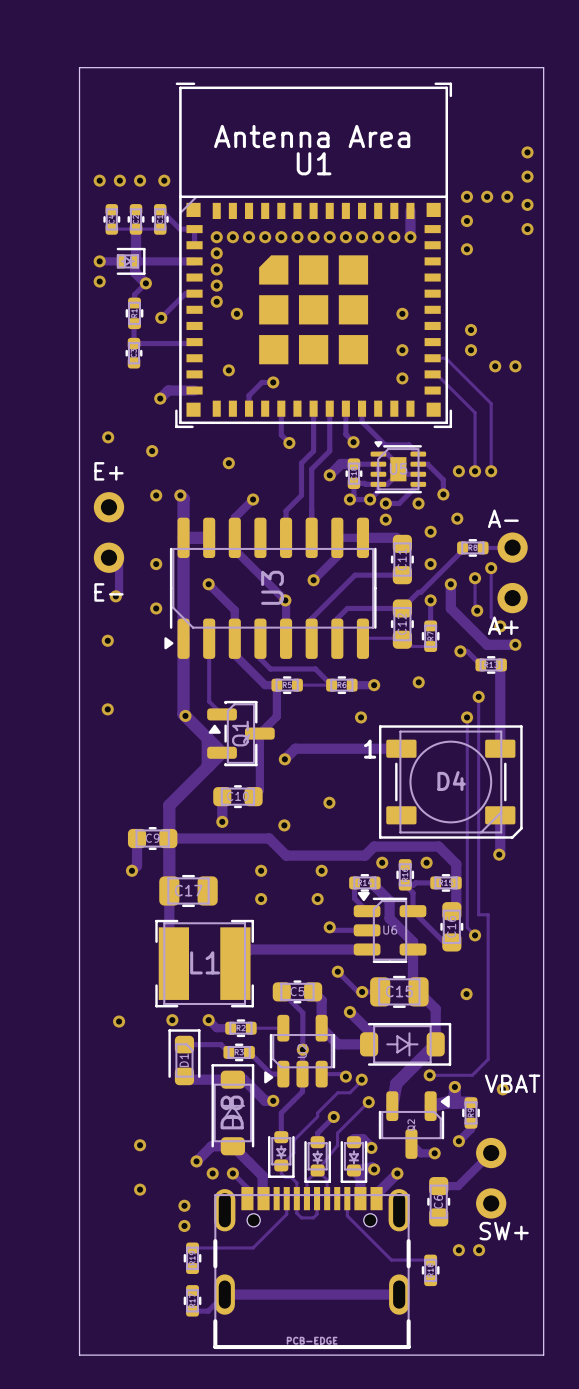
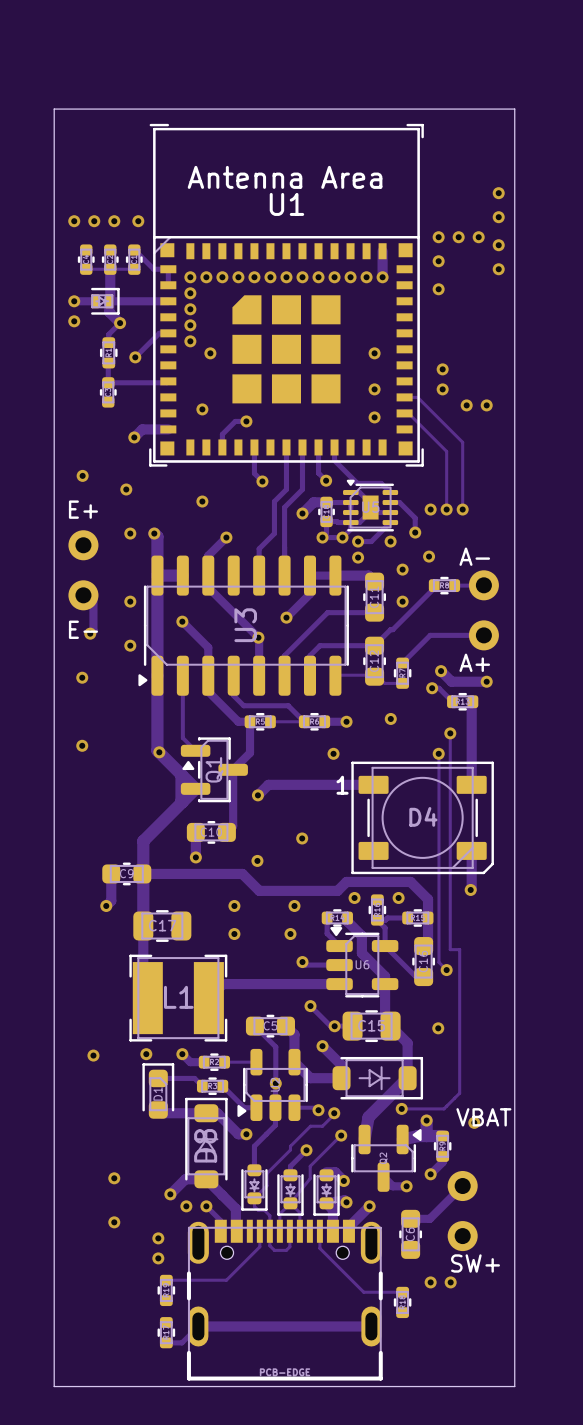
track: (491, 568) (491, 617) (500, 626) -> none
via: (491, 568) -> none
track: (475, 578) (475, 608) (477, 610) -> none
via: (475, 578) -> none
track: (450, 584) (450, 608) (487, 644) -> (441, 671) (451, 681) (458, 681)
via: (450, 584) -> none
track: (430, 600) (430, 625) -> (483, 635) (430, 635) (402, 663)
via: (430, 600) -> none
via: (477, 610) -> none
via: (500, 626) -> none
via: none -> (441, 671)

